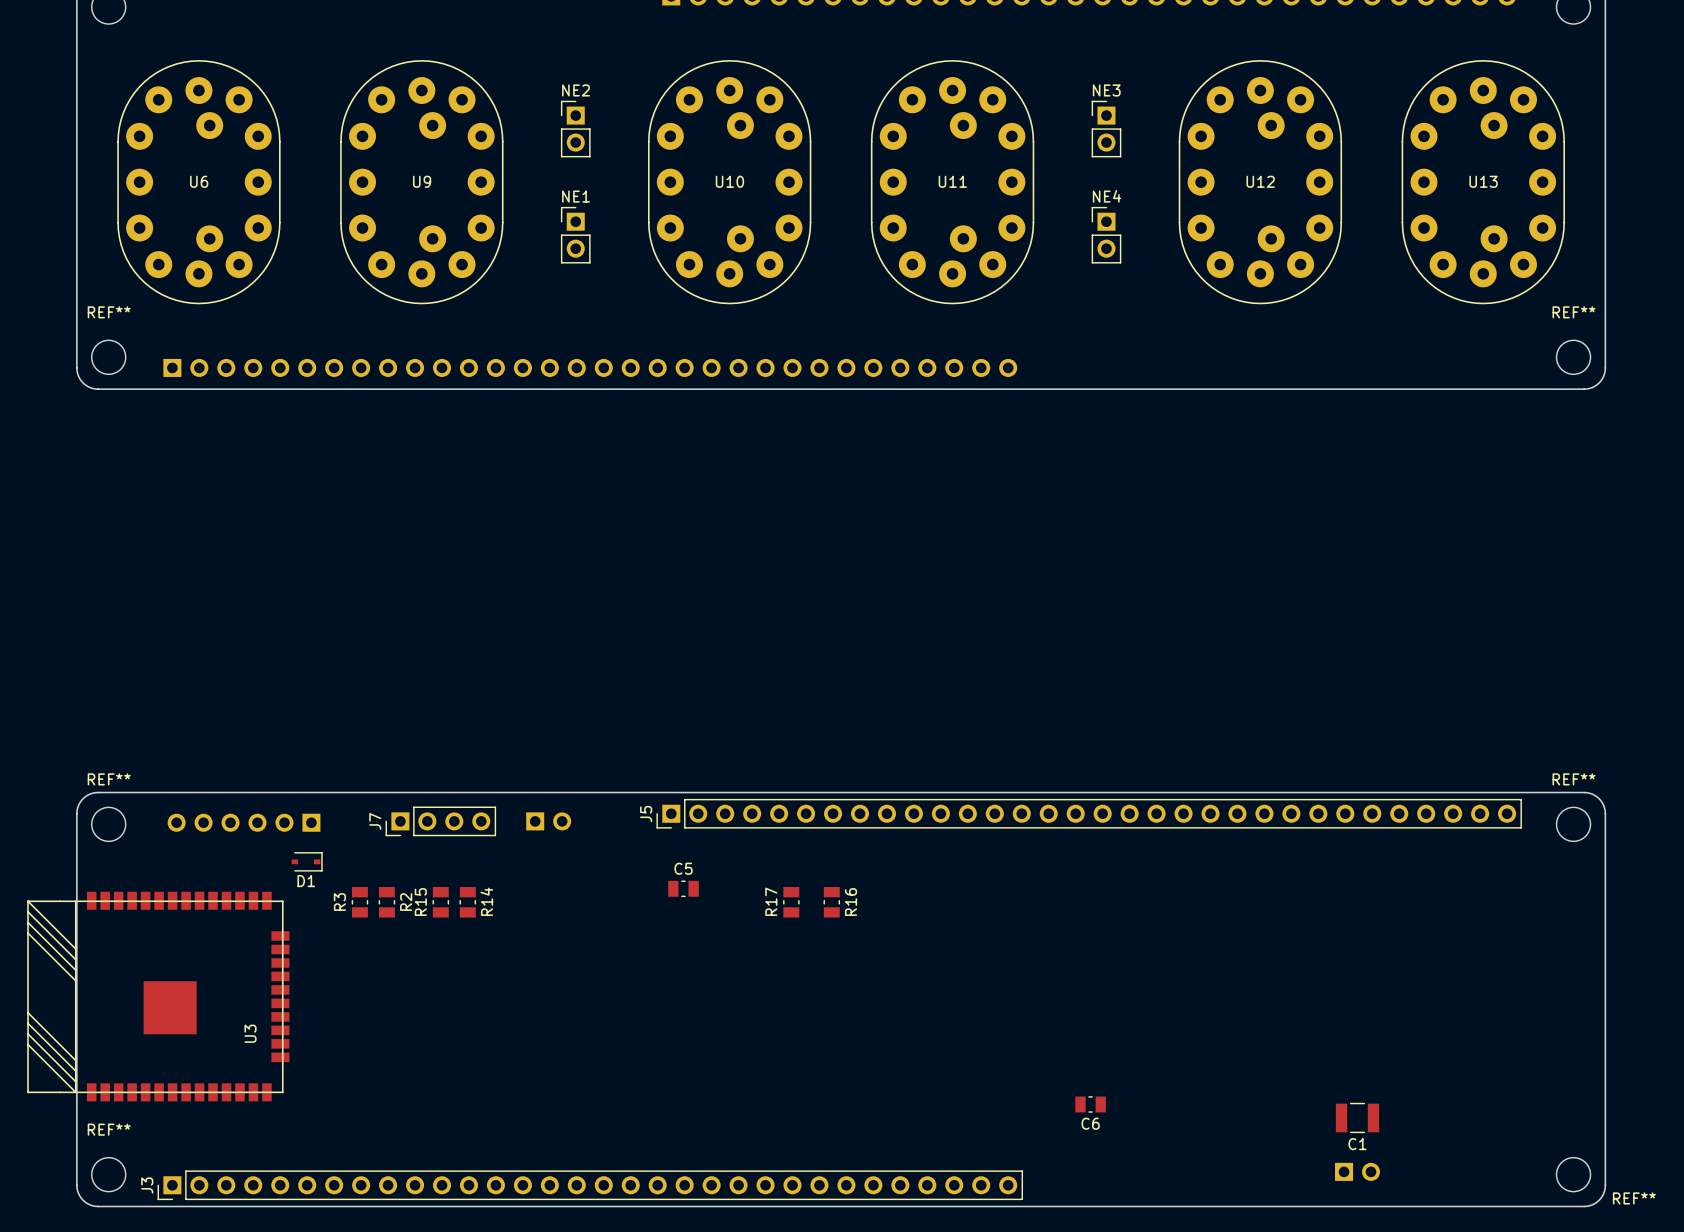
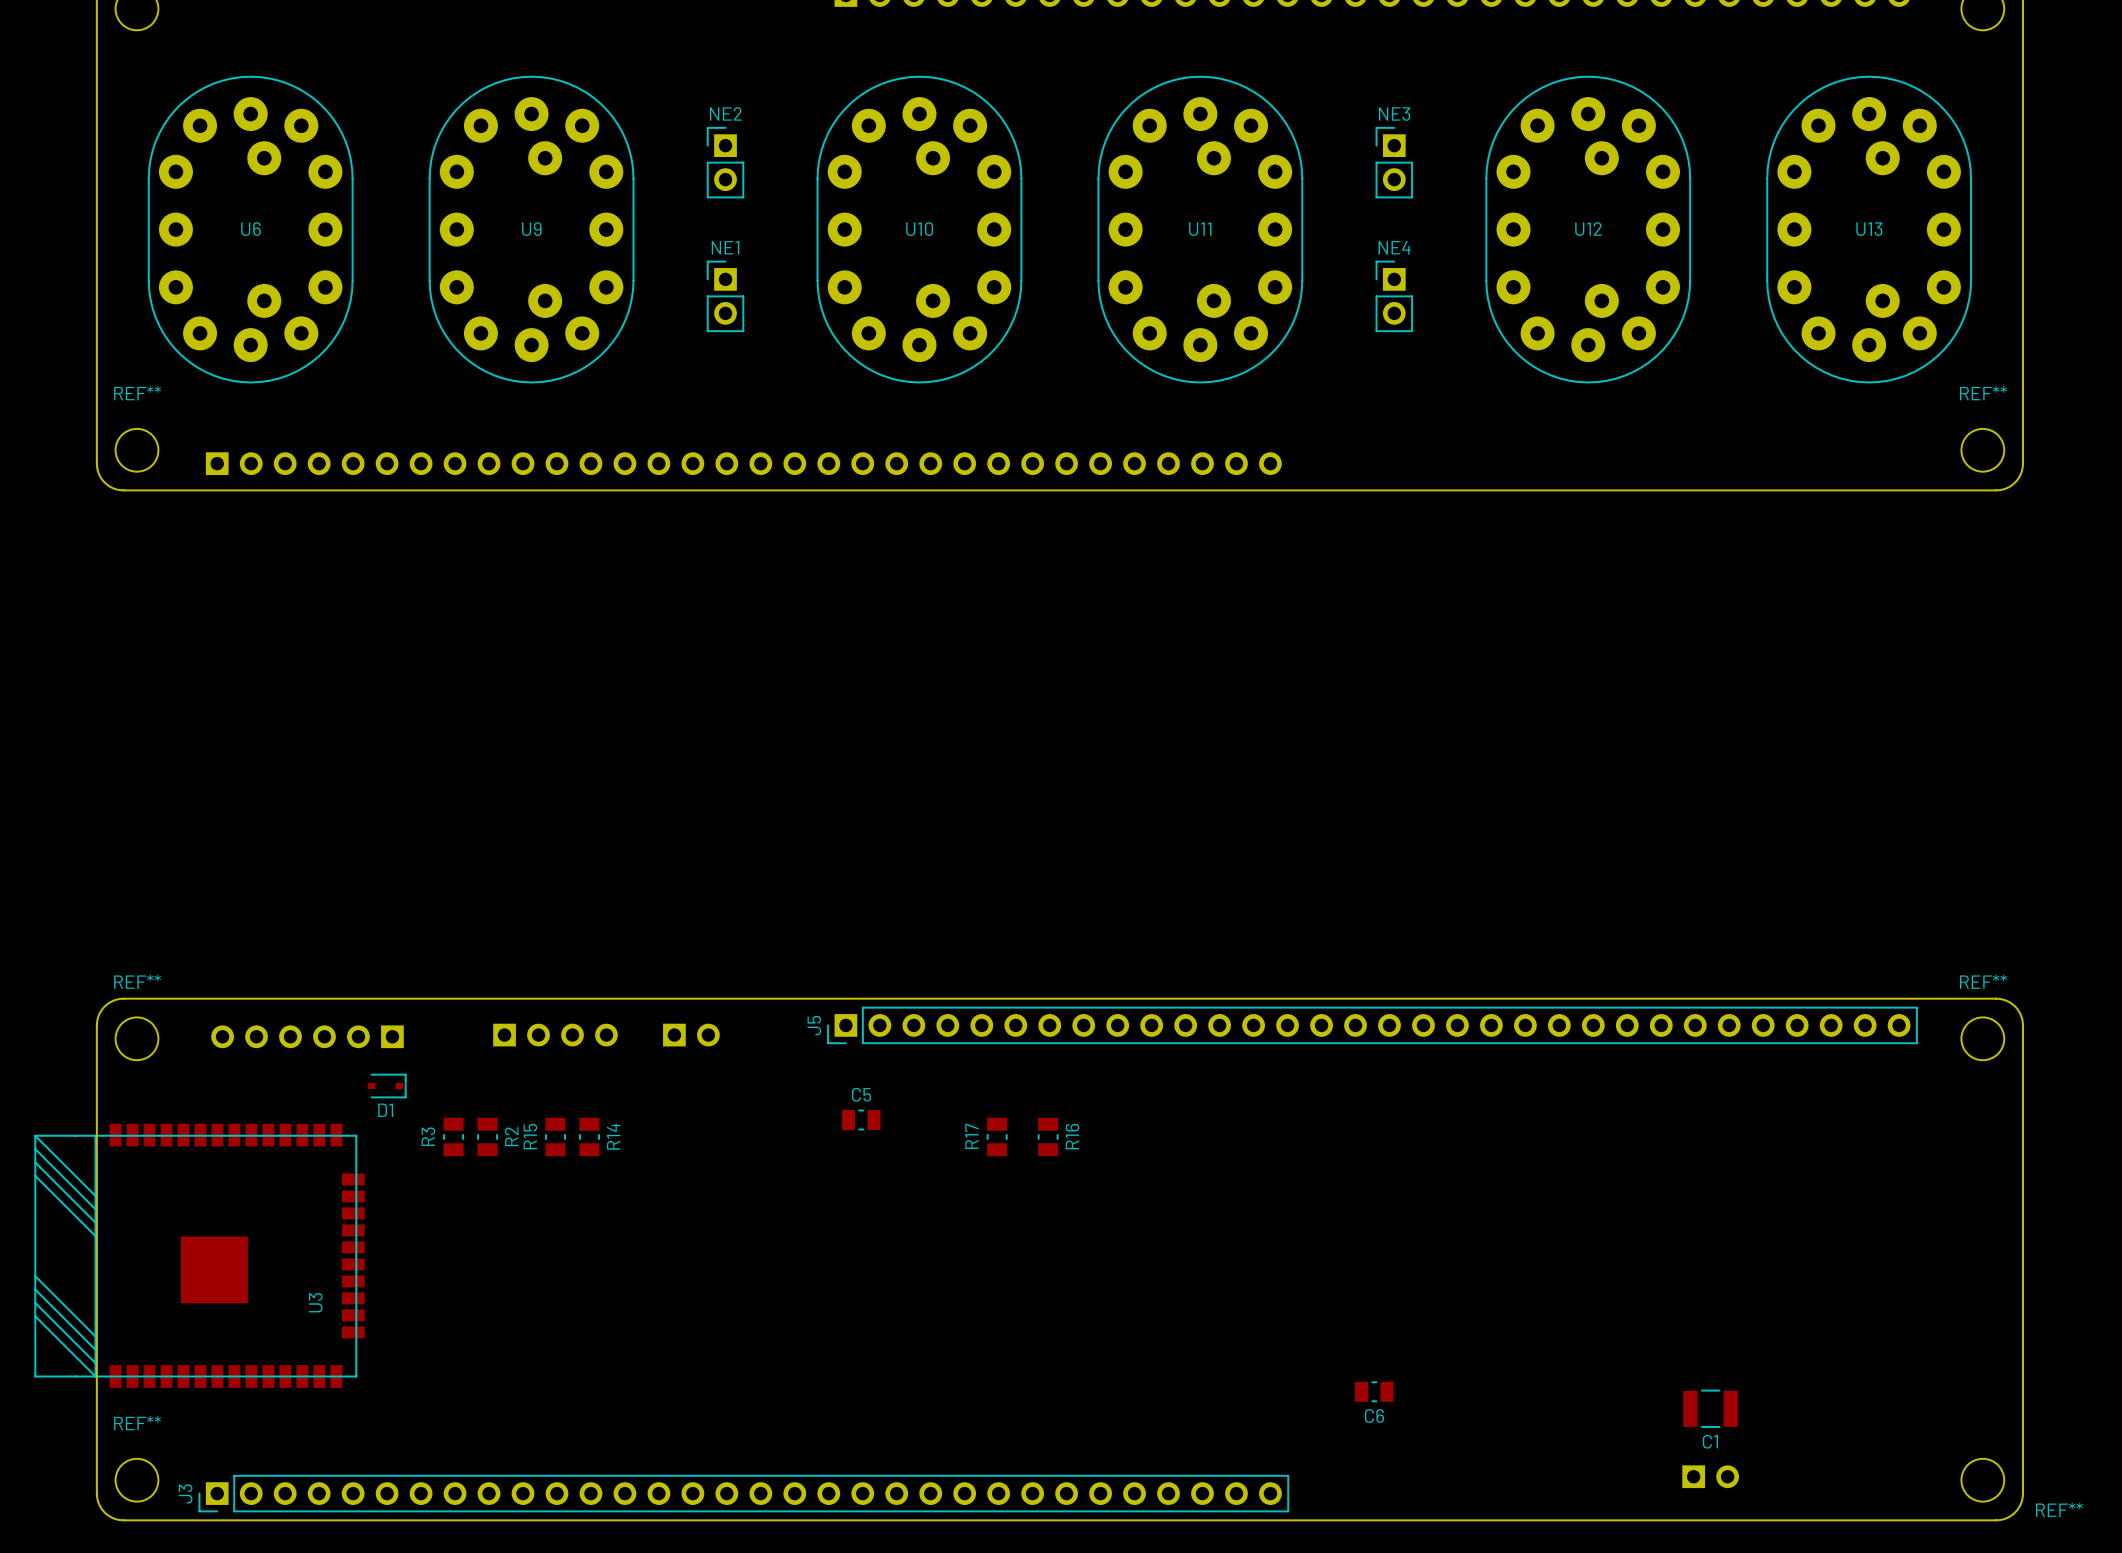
J7 side: top (440, 821) -> bottom (555, 1035)

